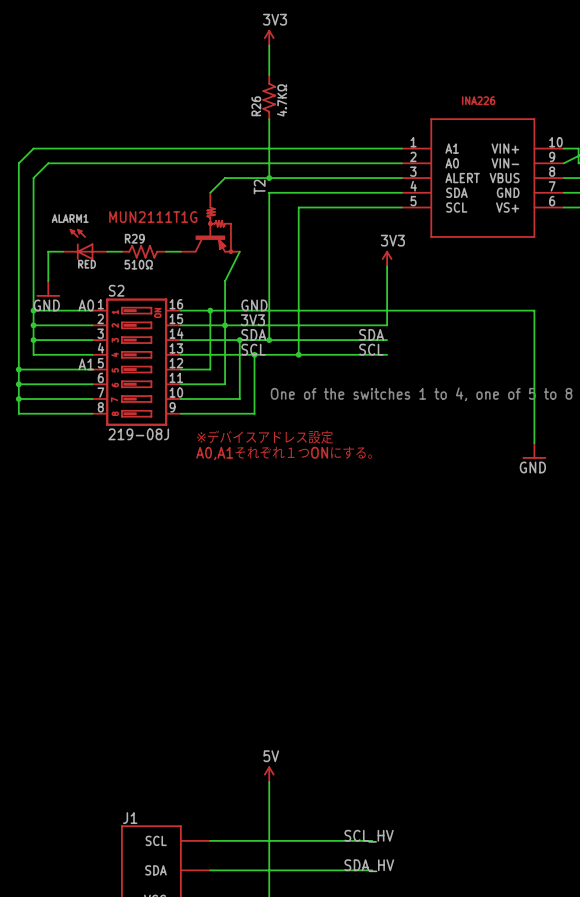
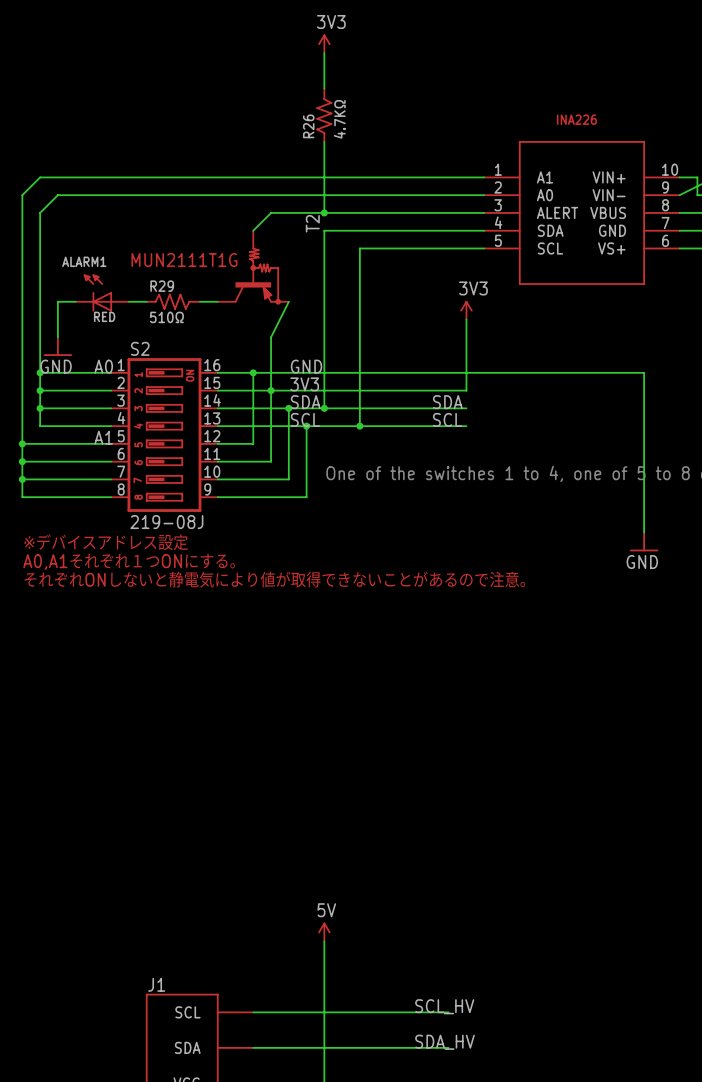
text: ※デバイスアドレス設定 (265, 437) -> none
text: none -> ※デバイスアドレス設定 (106, 542)
text: A0,A1それぞれ１つONにする。 (284, 453) -> none
text: none -> A0,A1それぞれ１つONにする。 (129, 561)
text: none -> それぞれONしないと静電気により値が取得できないことがあるので注意。 (274, 579)

